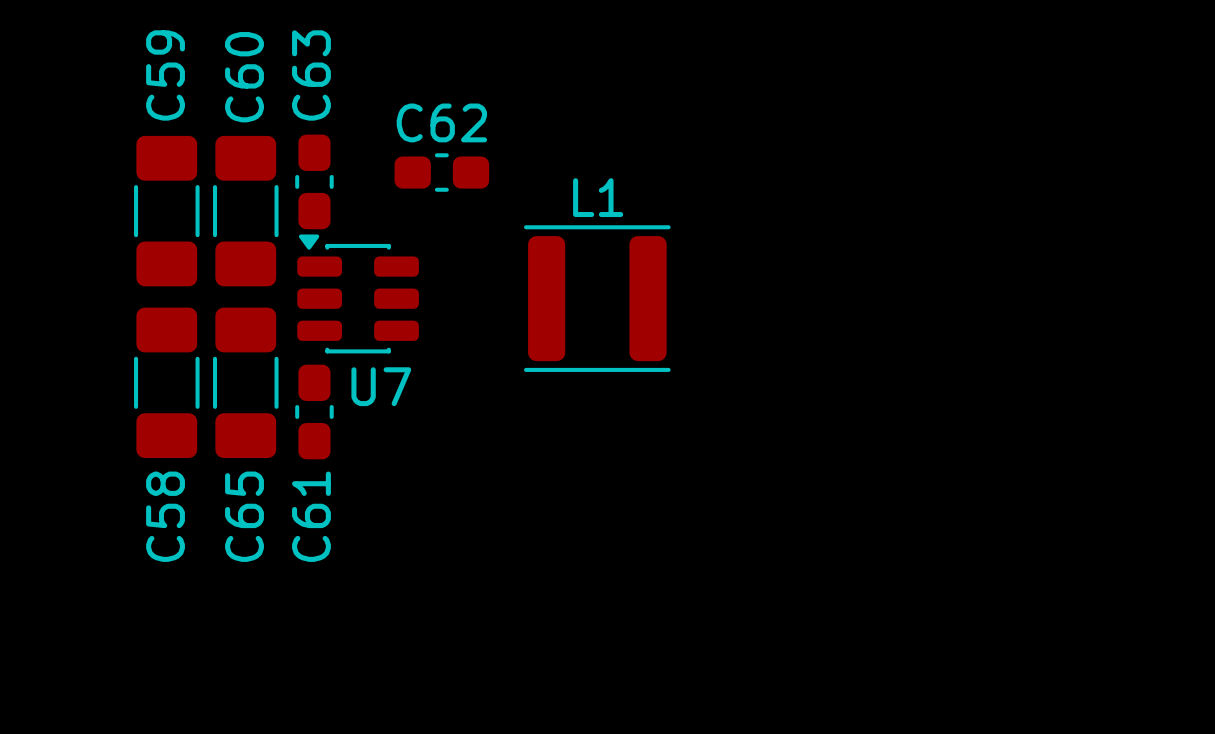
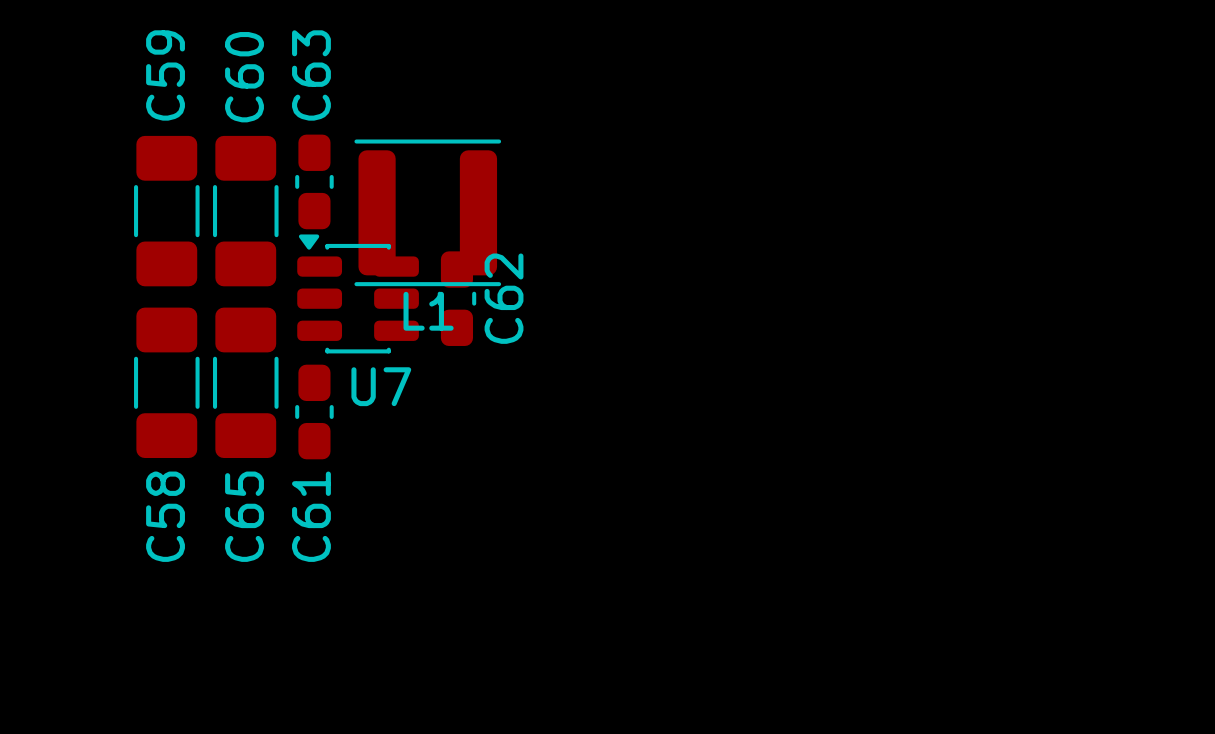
C62 rotation: 0° (441, 172) -> 90° clockwise (456, 298)
C62 position: (441, 172) -> (456, 298)
L1 name position: L1 (598, 197) -> L1 (428, 311)
L1 position: (597, 298) -> (427, 212)

